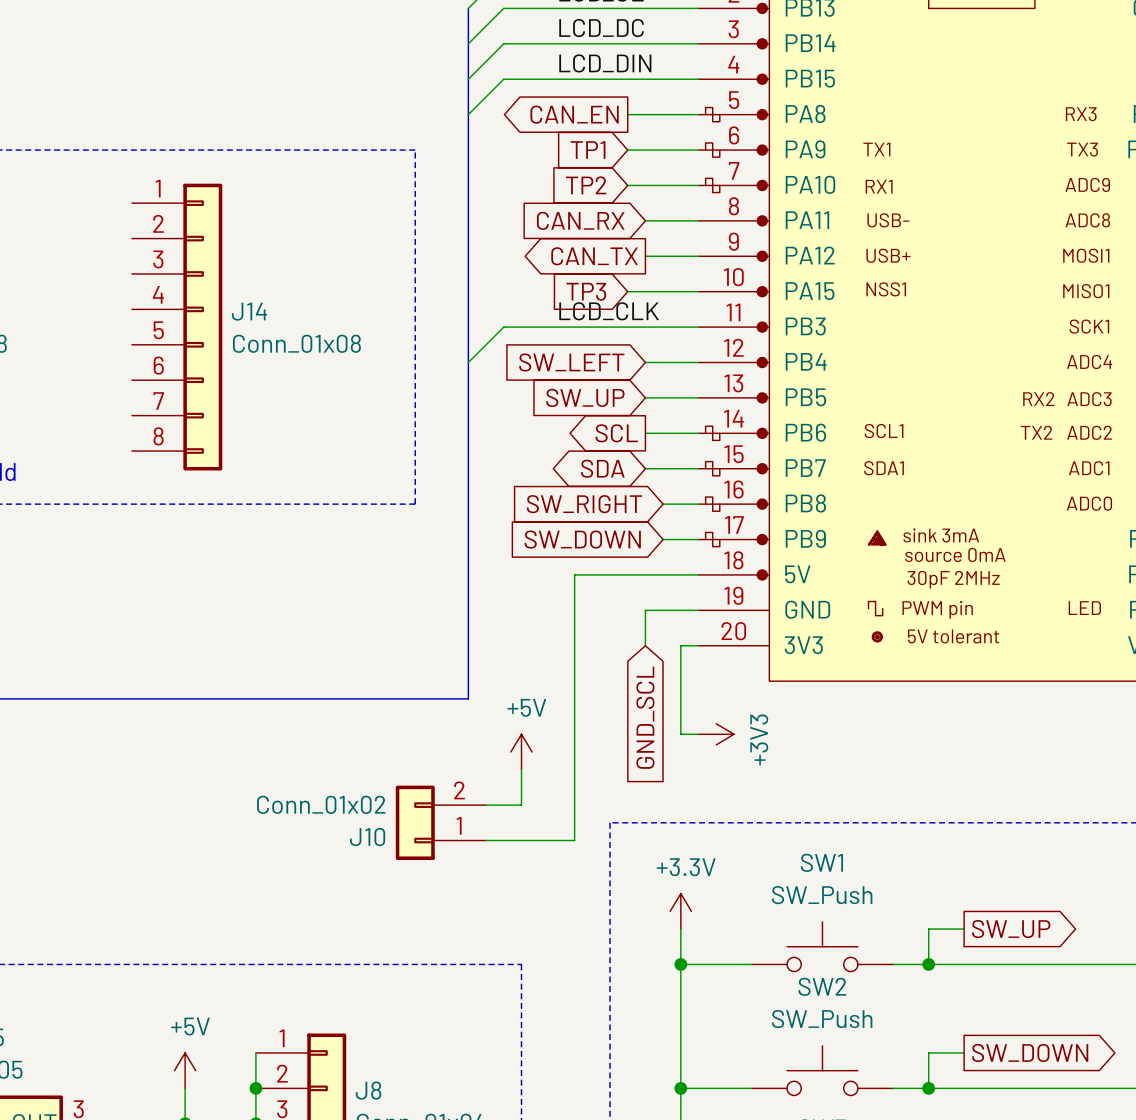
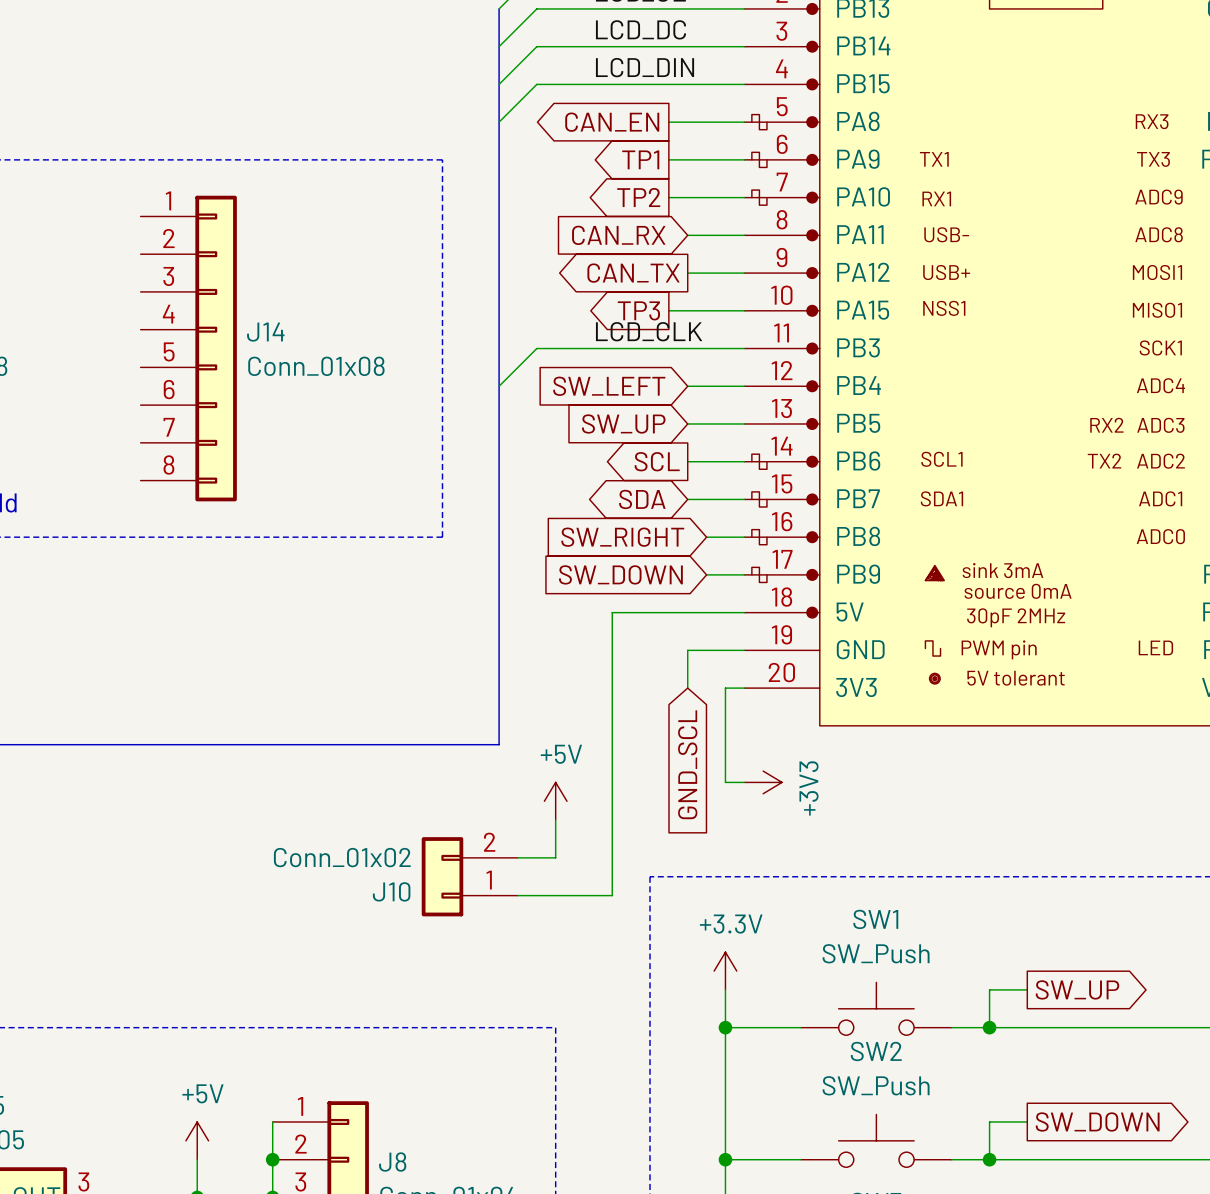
global label shape: input (588, 150) -> output (640, 159)
global label shape: input (586, 185) -> output (638, 197)
global label shape: input (586, 291) -> output (638, 310)

